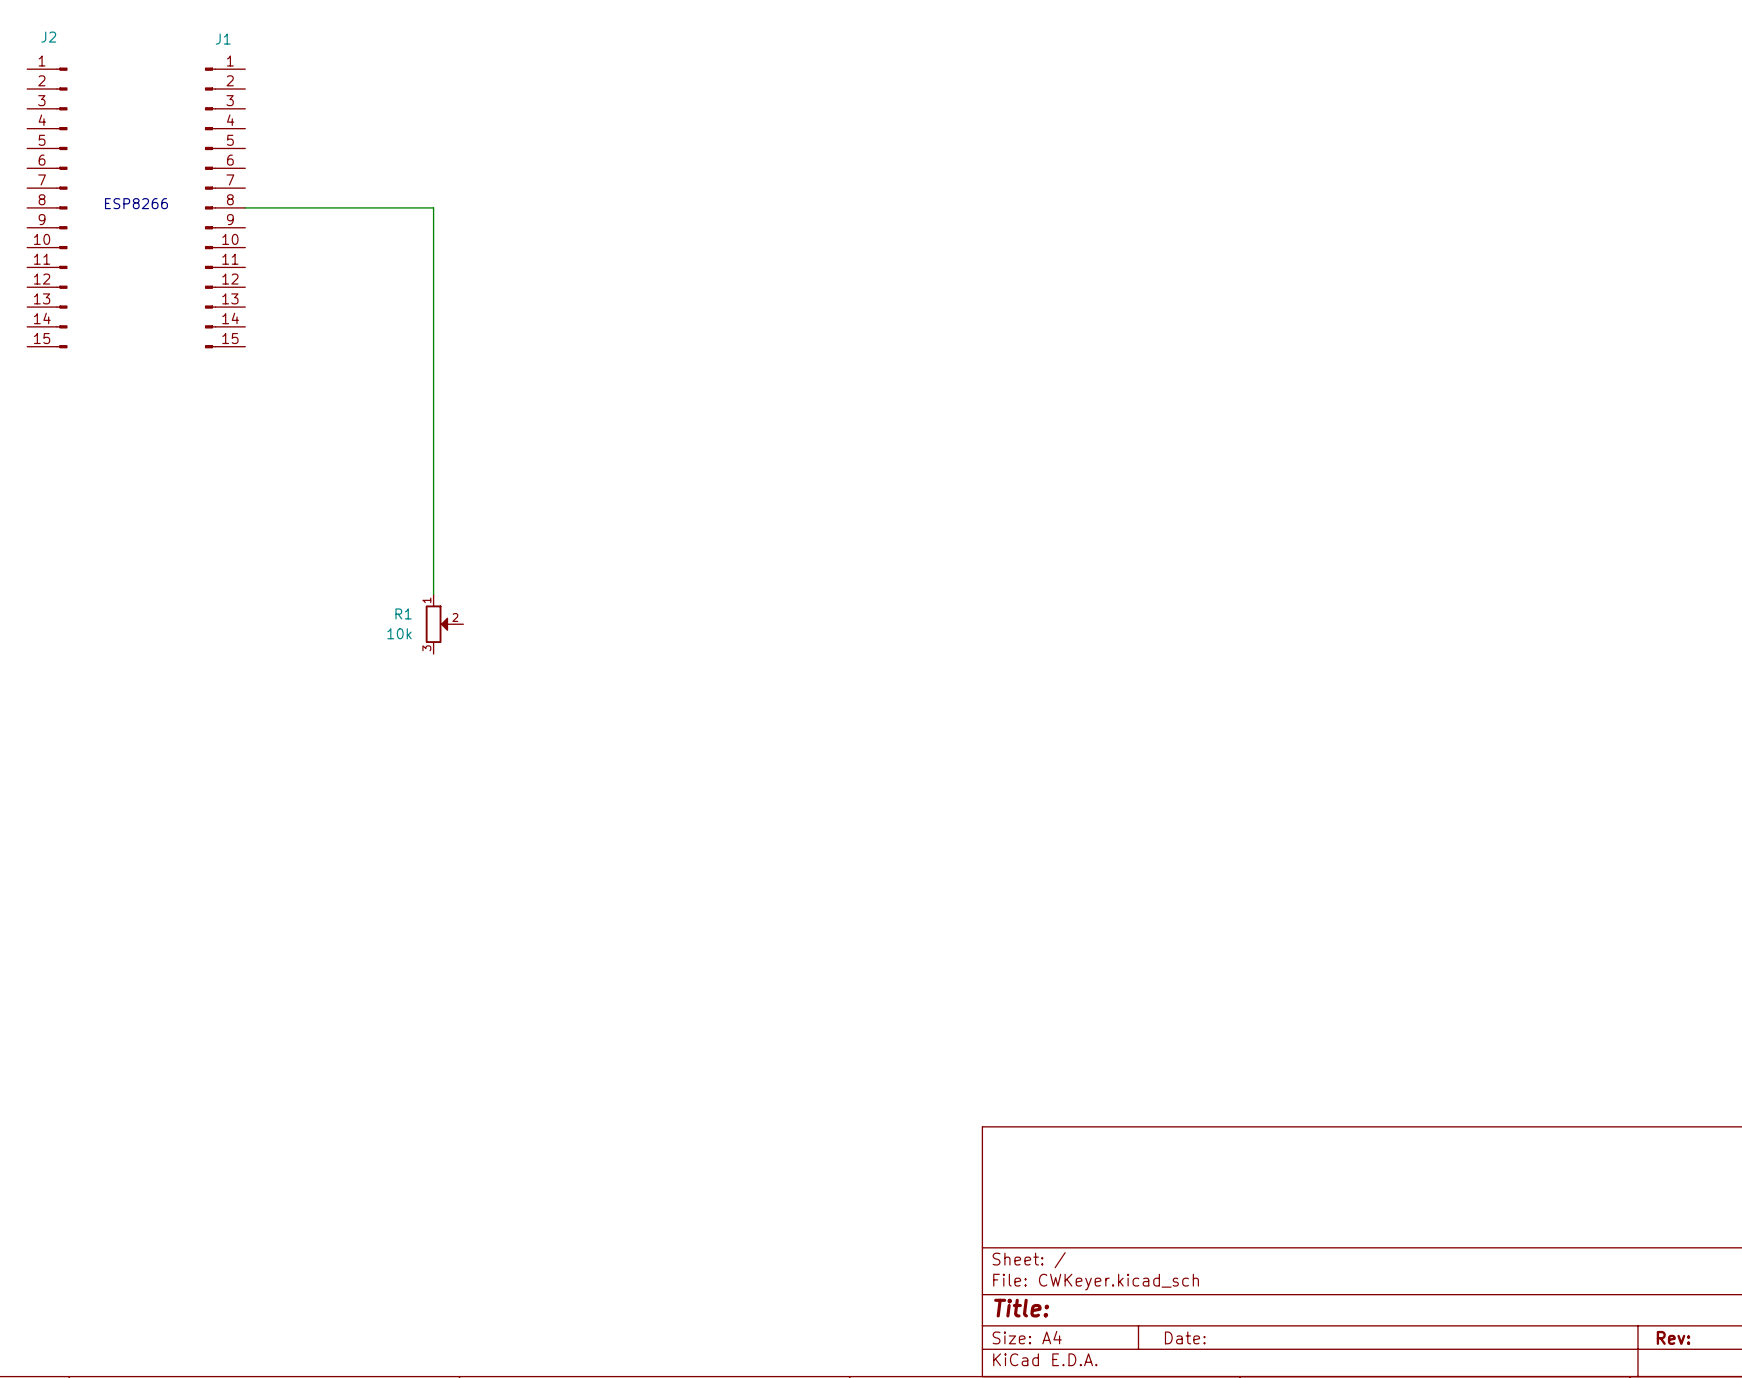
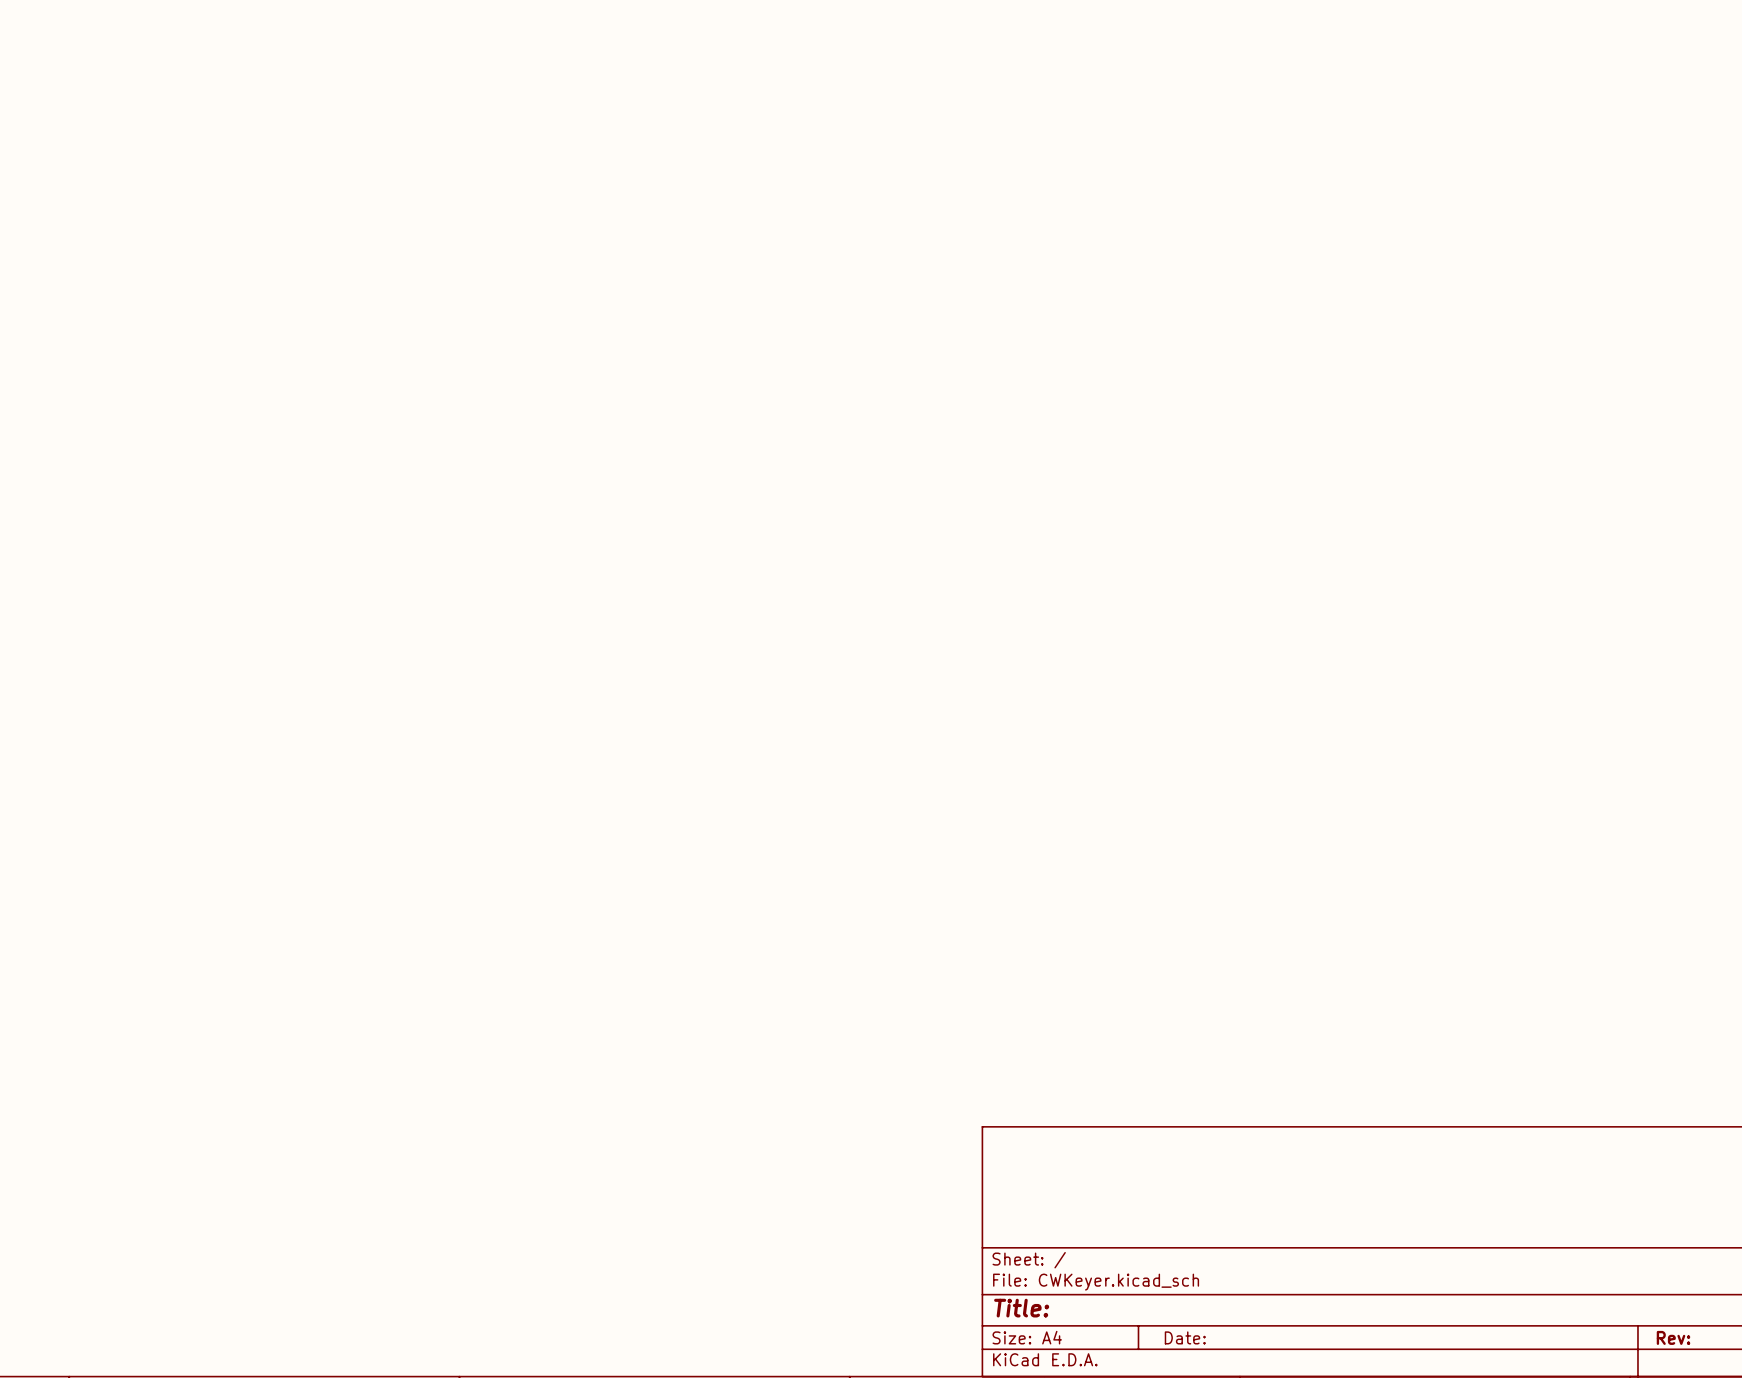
text: ESP8266 (136, 203) -> none
J2: (47, 207) -> none
J1: (225, 207) -> none
wire: (245, 207) (433, 207) (433, 594) -> none
R1: 10k (444, 624) -> none

